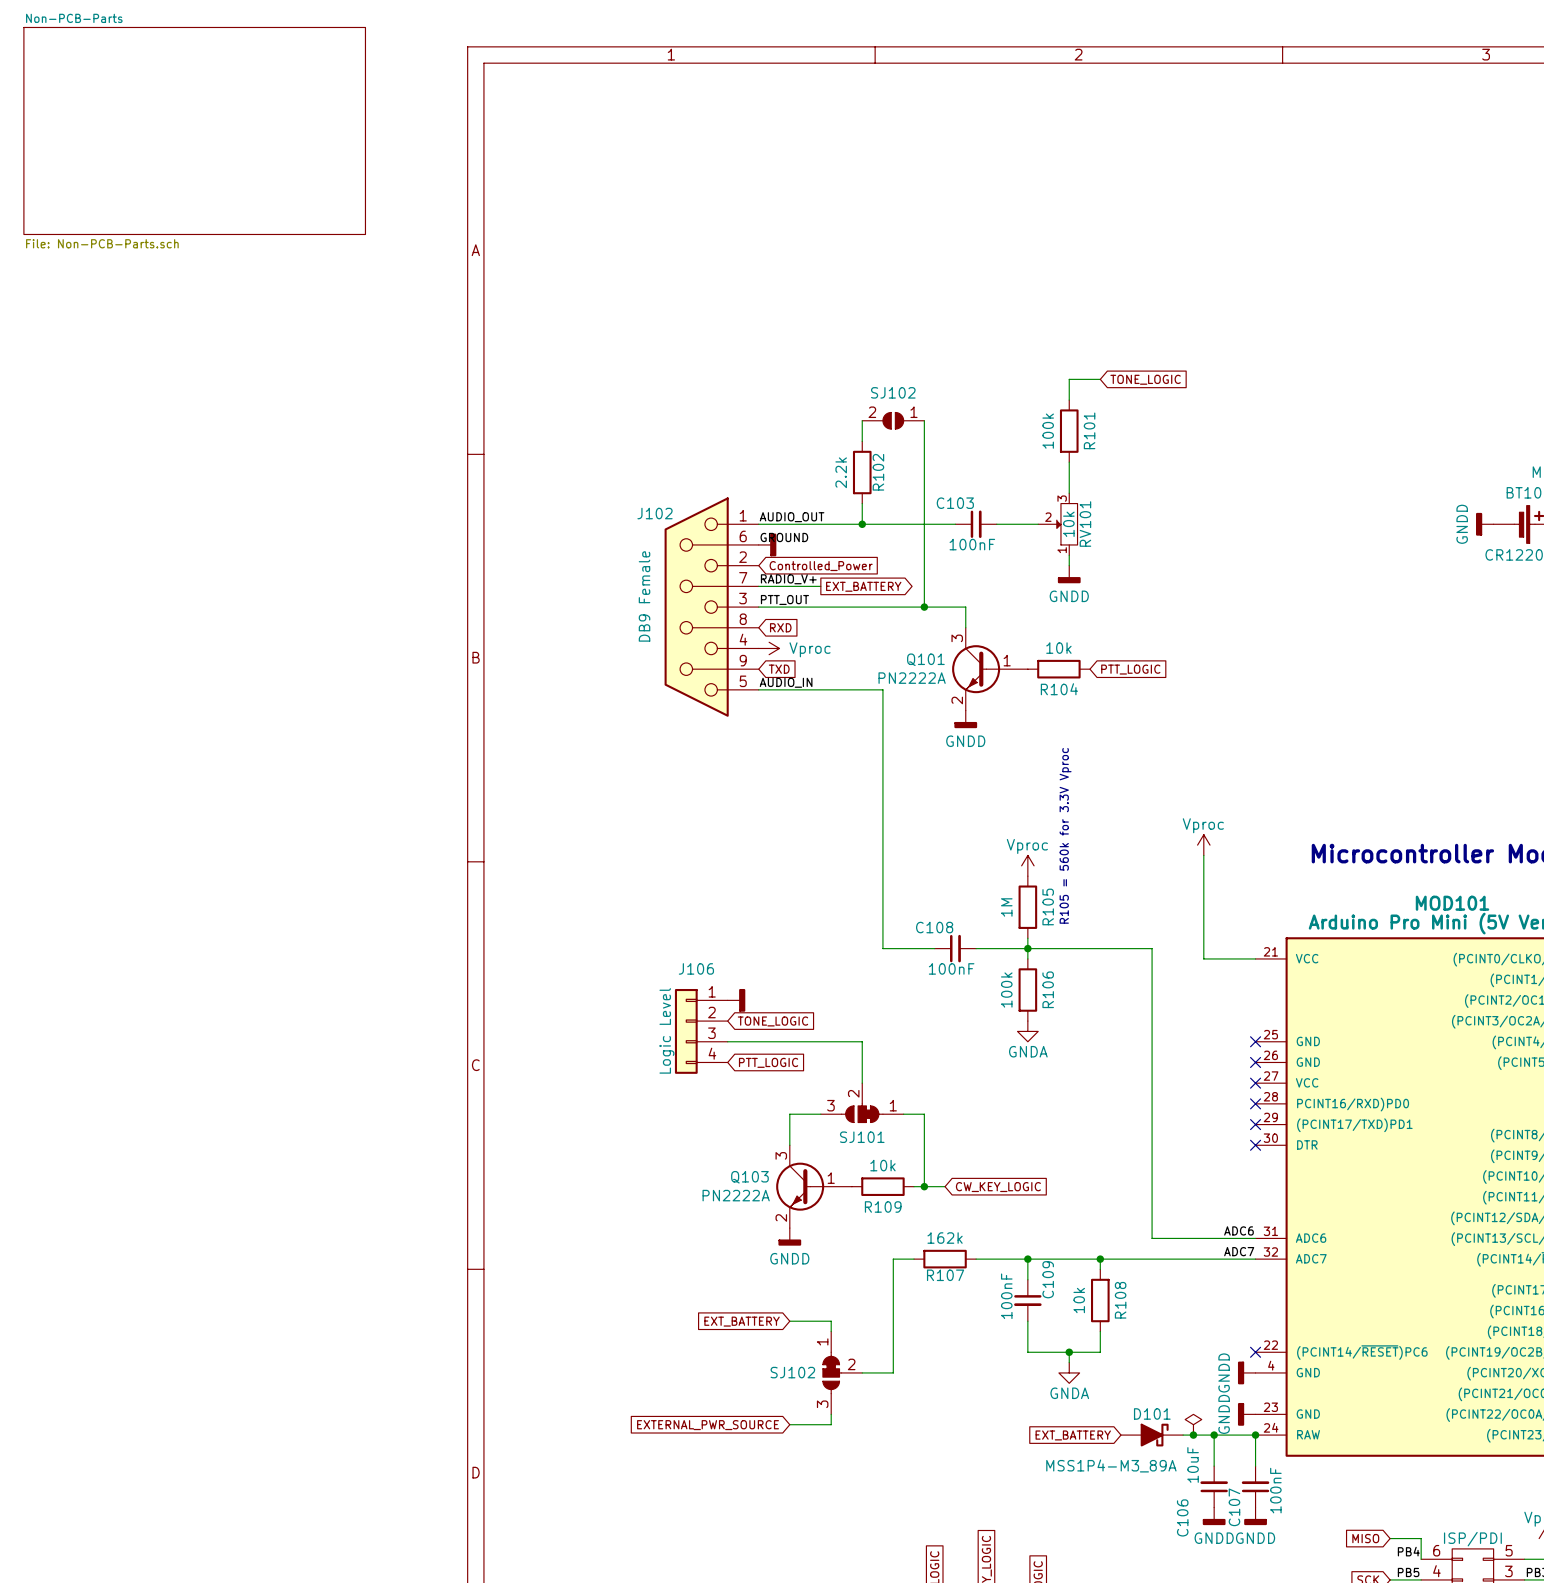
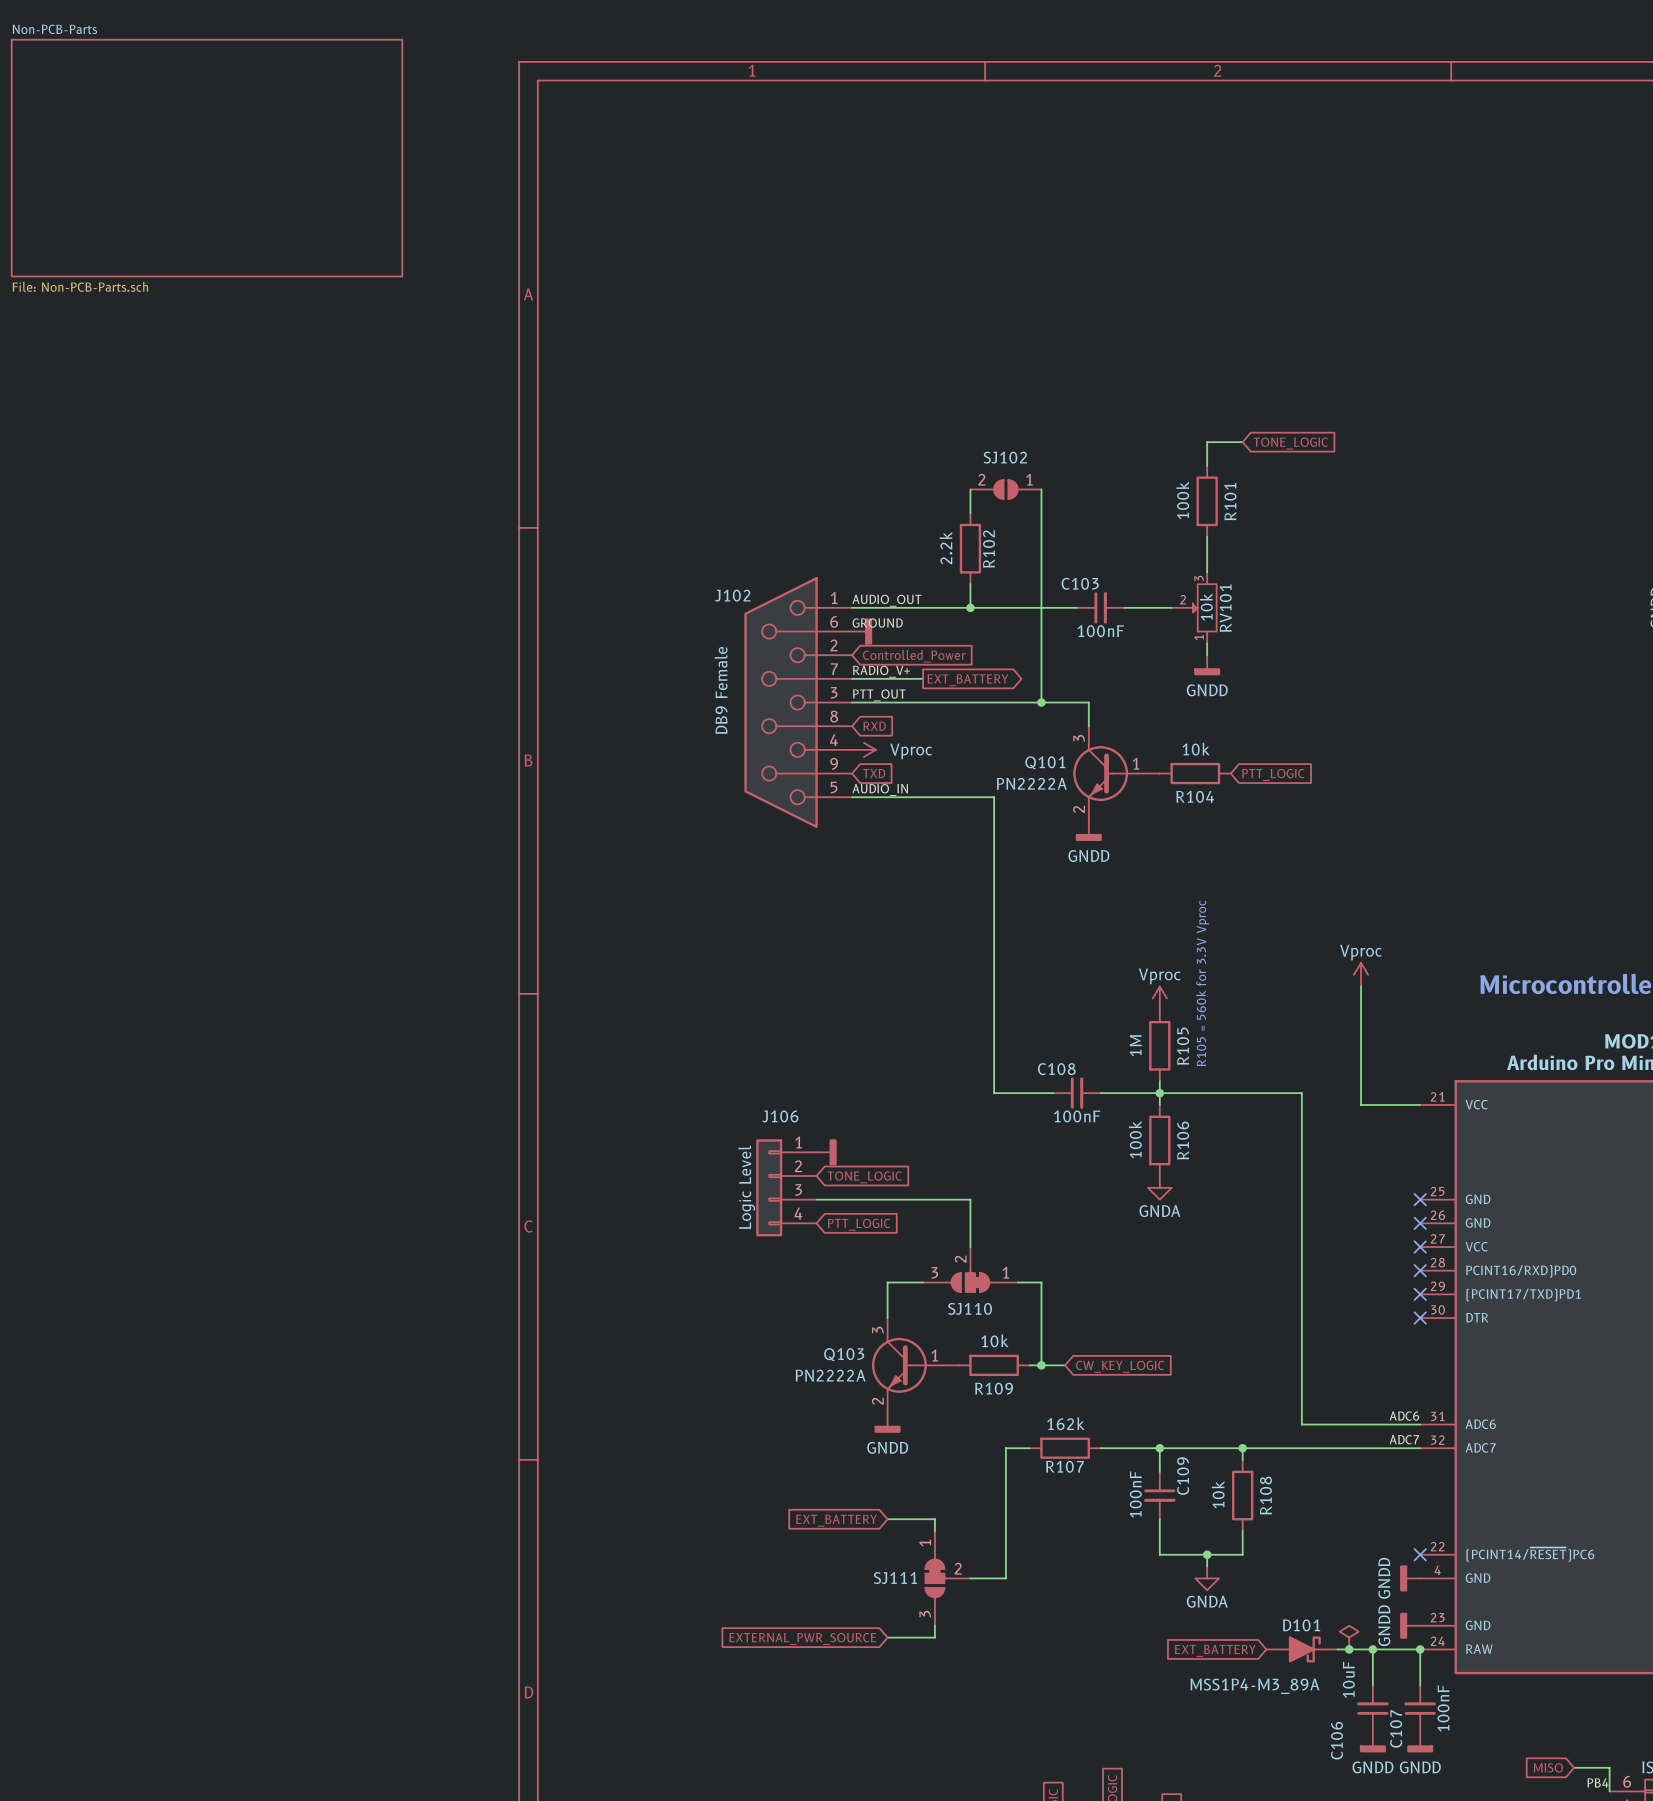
SJ101 name: SJ101 (862, 1137) -> SJ110 (970, 1308)
SJ102 name: SJ102 (792, 1372) -> SJ111 (895, 1578)

